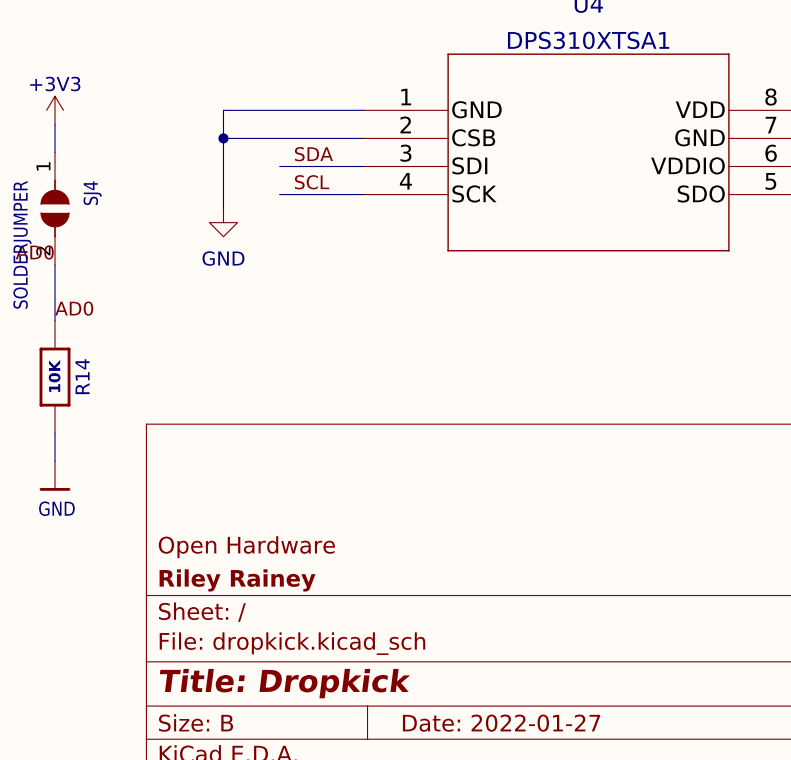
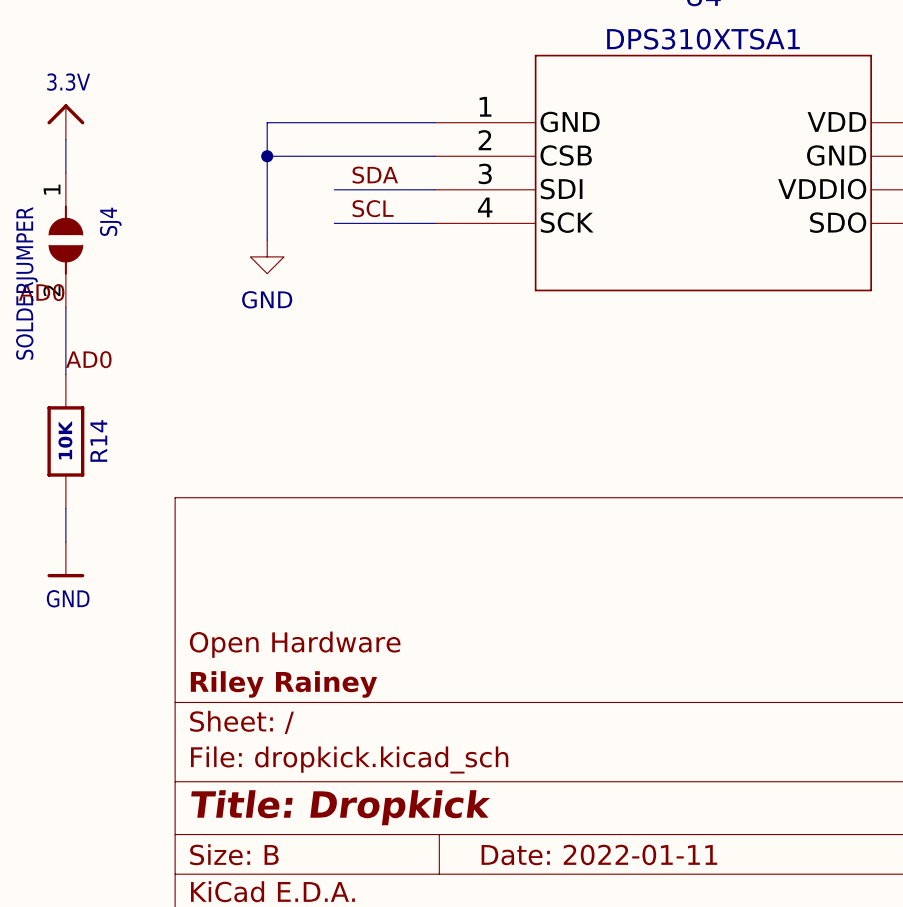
power symbol: +3V3 (55, 110) -> 3.3V (65, 121)
title block: Date: 2022-01-27 (501, 723) -> Date: 2022-01-11 (599, 854)

